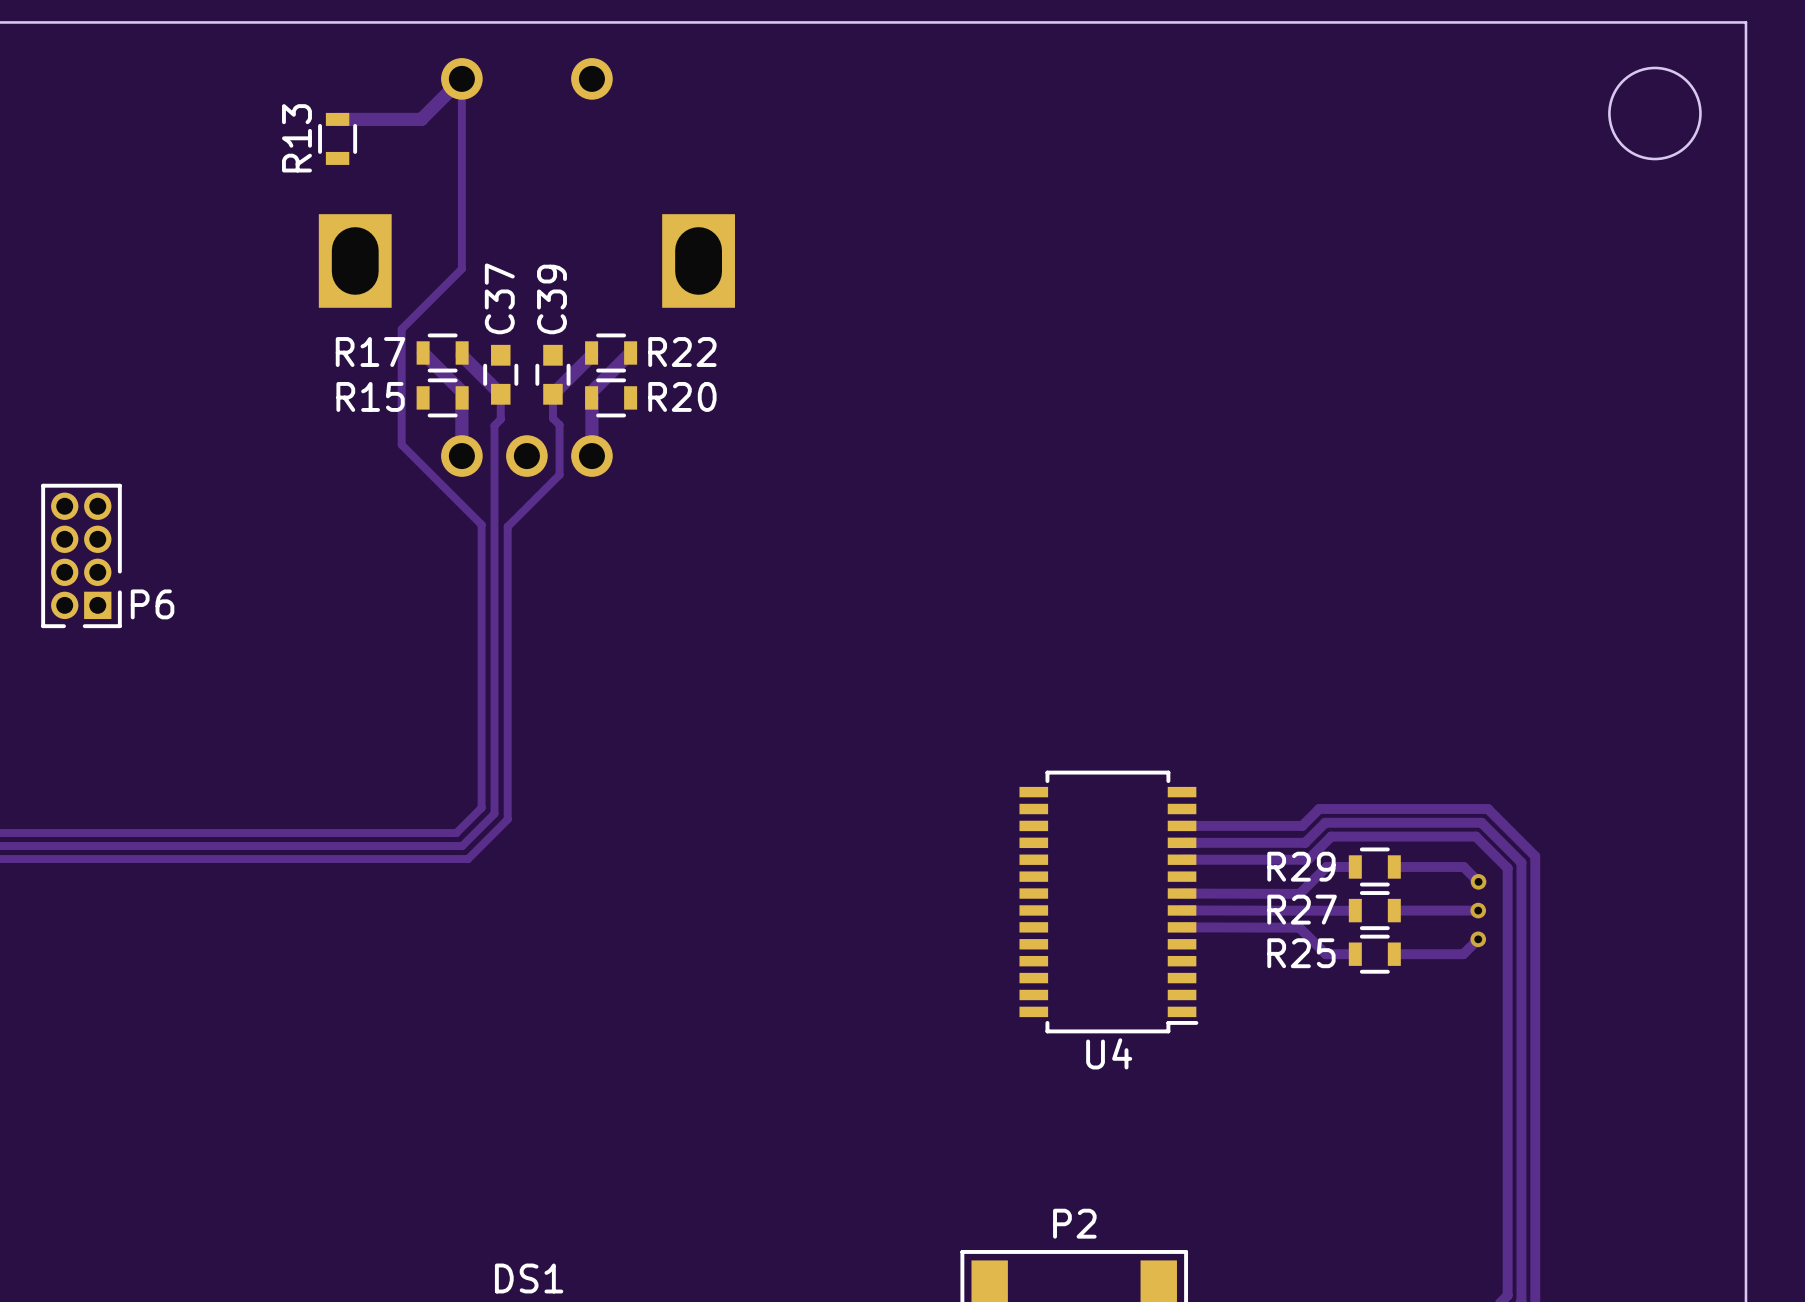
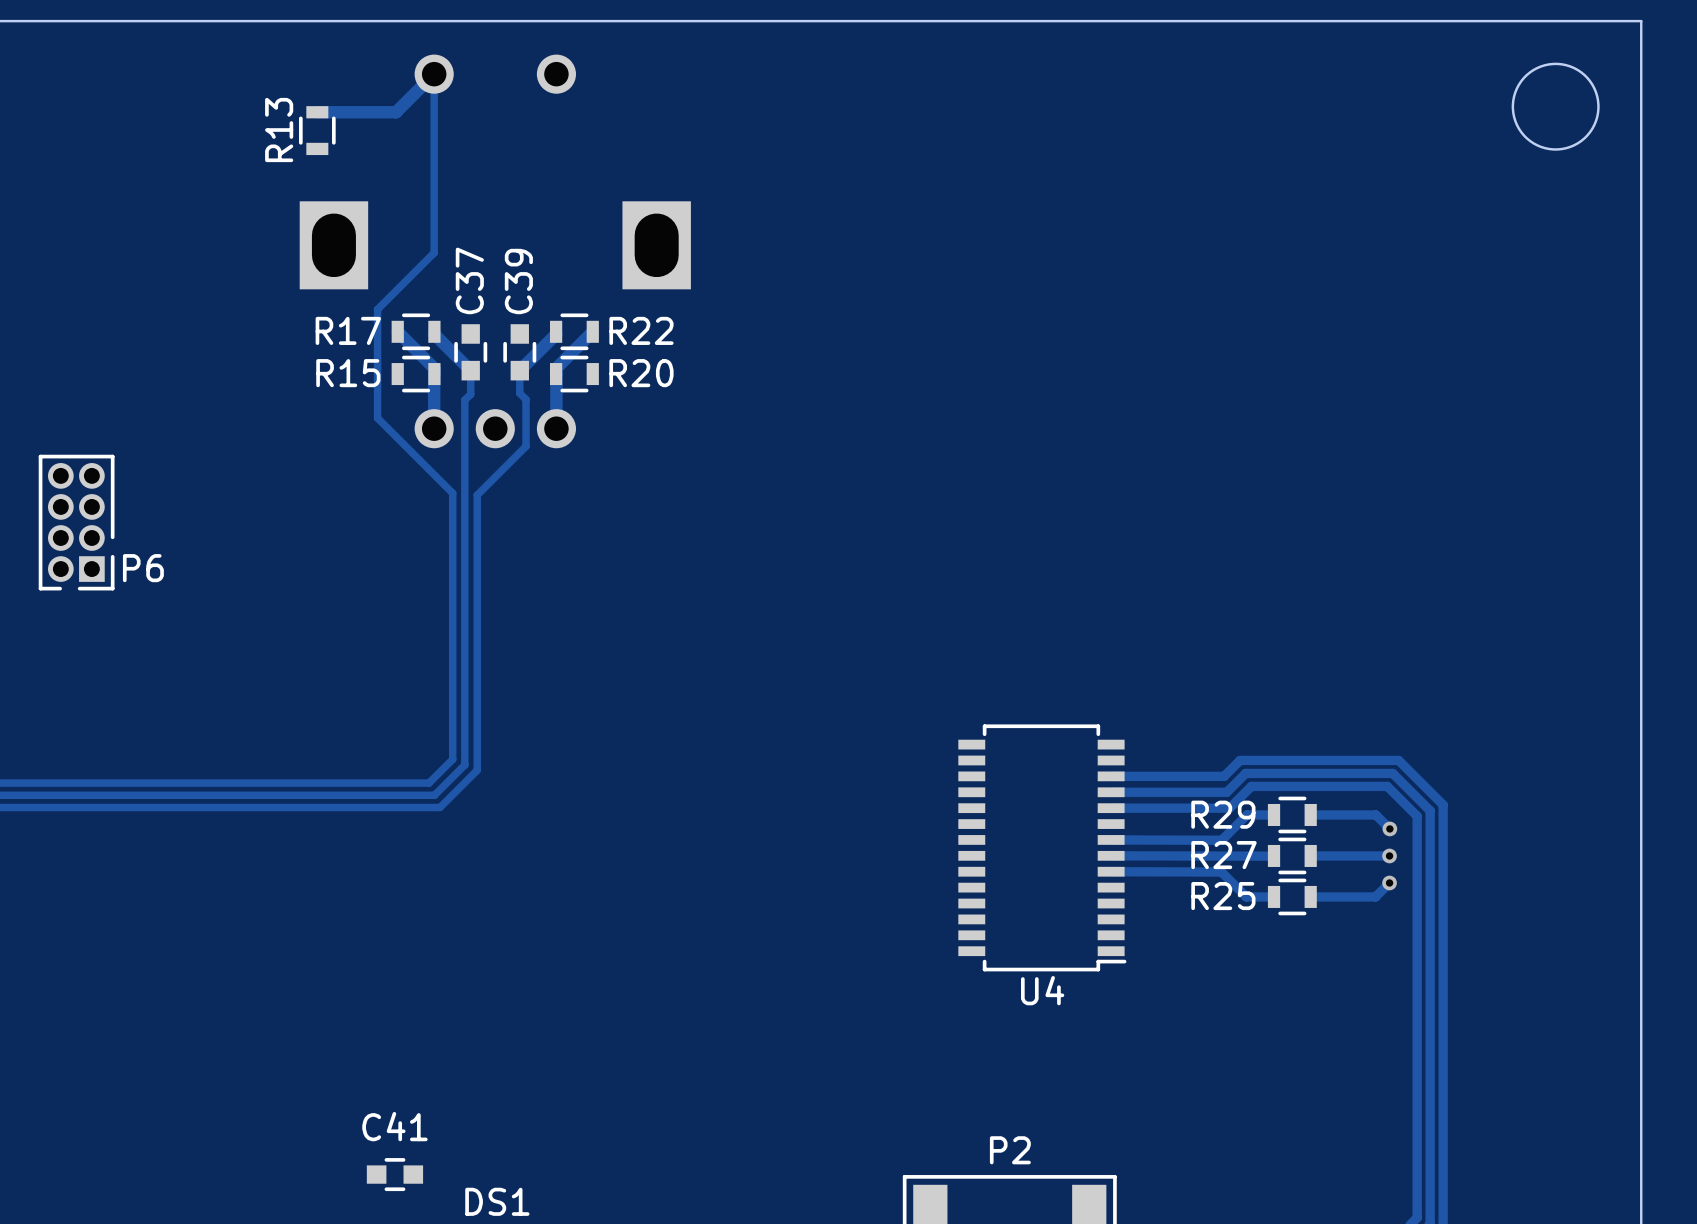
C41: none -> (394, 1174)

